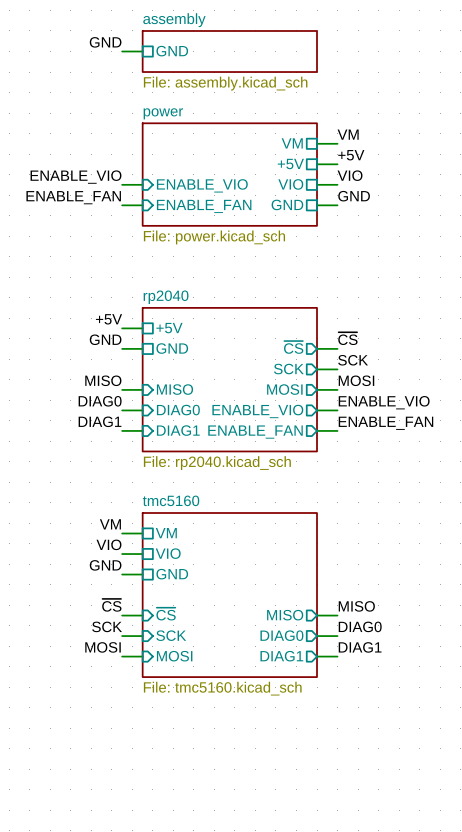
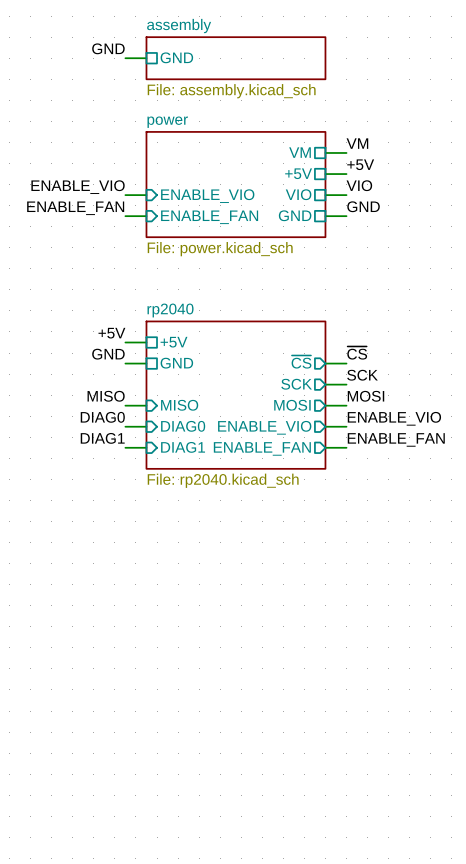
label: VM (110, 524) -> none
wire: (122, 533) (142, 533) -> none
sheet pin: VM (166, 533) -> none
label: VIO (108, 544) -> none
sheet pin: VIO (168, 553) -> none
wire: (122, 554) (142, 554) -> none
label: GND (105, 565) -> none
wire: (122, 574) (142, 574) -> none
sheet pin: GND (172, 574) -> none
sheet tmc5160: File: tmc5160.kicad_sch (229, 595) -> none
label: ~{CS} (111, 605) -> none
label: MISO (356, 606) -> none
sheet pin: ~{CS} (166, 614) -> none
wire: (122, 615) (142, 615) -> none
sheet pin: MISO (285, 615) -> none
wire: (317, 615) (337, 615) -> none
label: SCK (107, 626) -> none
label: DIAG0 (360, 626) -> none
sheet pin: SCK (171, 635) -> none
sheet pin: DIAG0 (281, 635) -> none
wire: (122, 636) (142, 636) -> none
wire: (317, 636) (337, 636) -> none
label: MOSI (103, 647) -> none
label: DIAG1 (360, 647) -> none
wire: (122, 656) (142, 656) -> none
sheet pin: MOSI (174, 656) -> none
sheet pin: DIAG1 (281, 656) -> none
wire: (317, 656) (337, 656) -> none

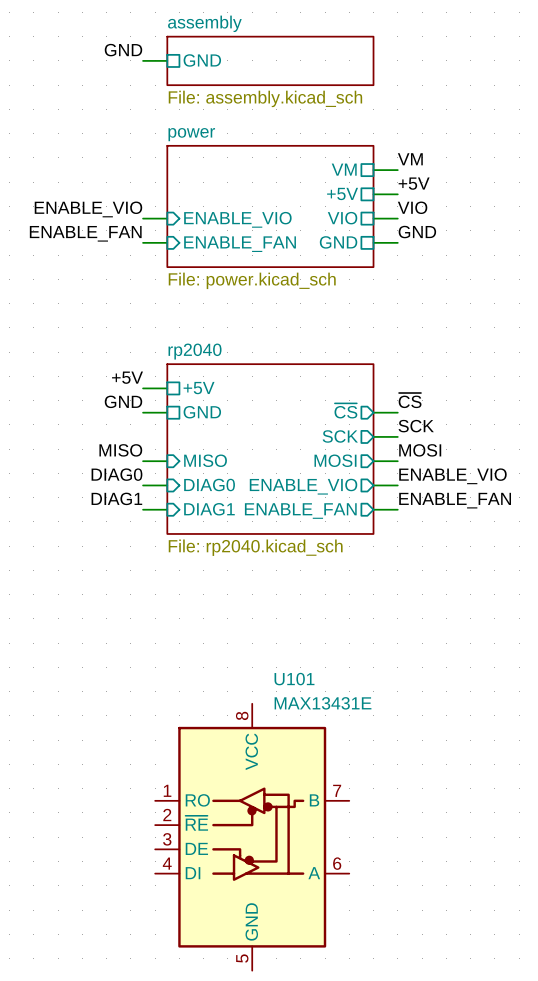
U101: none -> MAX13431E (252, 837)

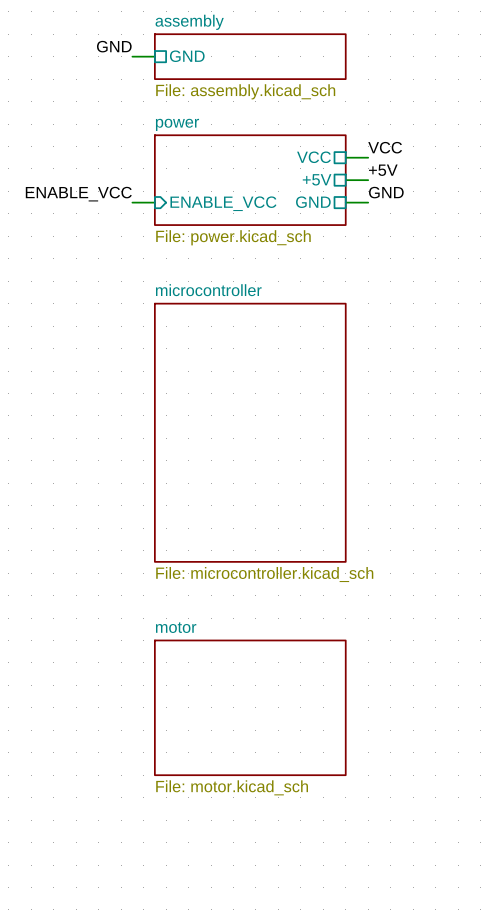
label: VM (410, 159) -> VCC (385, 147)
sheet pin: VM (344, 169) -> VCC (313, 157)
sheet power: none -> File: power.kicad_sch (250, 180)
sheet power: File: power.kicad_sch (270, 206) -> none
label: VIO (412, 207) -> GND (386, 192)
label: ENABLE_VIO (88, 209) -> ENABLE_VCC (78, 194)
sheet pin: VIO (342, 218) -> GND (313, 202)
sheet pin: ENABLE_VIO (237, 219) -> ENABLE_VCC (223, 203)
label: GND (417, 232) -> none
label: ENABLE_FAN (85, 233) -> none
wire: (143, 242) (167, 242) -> none
sheet pin: GND (338, 242) -> none
wire: (373, 242) (397, 242) -> none
sheet pin: ENABLE_FAN (240, 244) -> none
label: +5V (127, 377) -> none
wire: (143, 388) (167, 388) -> none
sheet pin: +5V (199, 388) -> none
label: ~{CS} (410, 400) -> none
label: GND (123, 401) -> none
sheet pin: ~{CS} (345, 410) -> none
wire: (143, 412) (167, 412) -> none
sheet pin: GND (202, 412) -> none
wire: (373, 412) (397, 412) -> none
label: SCK (416, 426) -> none
sheet pin: SCK (340, 436) -> none
wire: (373, 436) (397, 436) -> none
sheet rp2040: File: rp2040.kicad_sch (270, 449) -> none
label: MISO (120, 450) -> none
label: MOSI (420, 450) -> none
sheet pin: MISO (205, 460) -> none
sheet pin: MOSI (335, 460) -> none
wire: (143, 461) (167, 461) -> none
wire: (373, 461) (397, 461) -> none
sheet microcontroller: none -> File: microcontroller.kicad_sch (250, 432)
label: DIAG0 (116, 474) -> none
label: ENABLE_VIO (452, 476) -> none
wire: (143, 485) (167, 485) -> none
sheet pin: DIAG0 (209, 485) -> none
wire: (373, 485) (397, 485) -> none
sheet pin: ENABLE_VIO (303, 486) -> none
label: DIAG1 (116, 498) -> none
label: ENABLE_FAN (455, 500) -> none
wire: (143, 509) (167, 509) -> none
sheet pin: DIAG1 (209, 509) -> none
wire: (373, 509) (397, 509) -> none
sheet pin: ENABLE_FAN (300, 511) -> none
sheet motor: none -> File: motor.kicad_sch (250, 707)
U101: MAX13431E (252, 837) -> none

